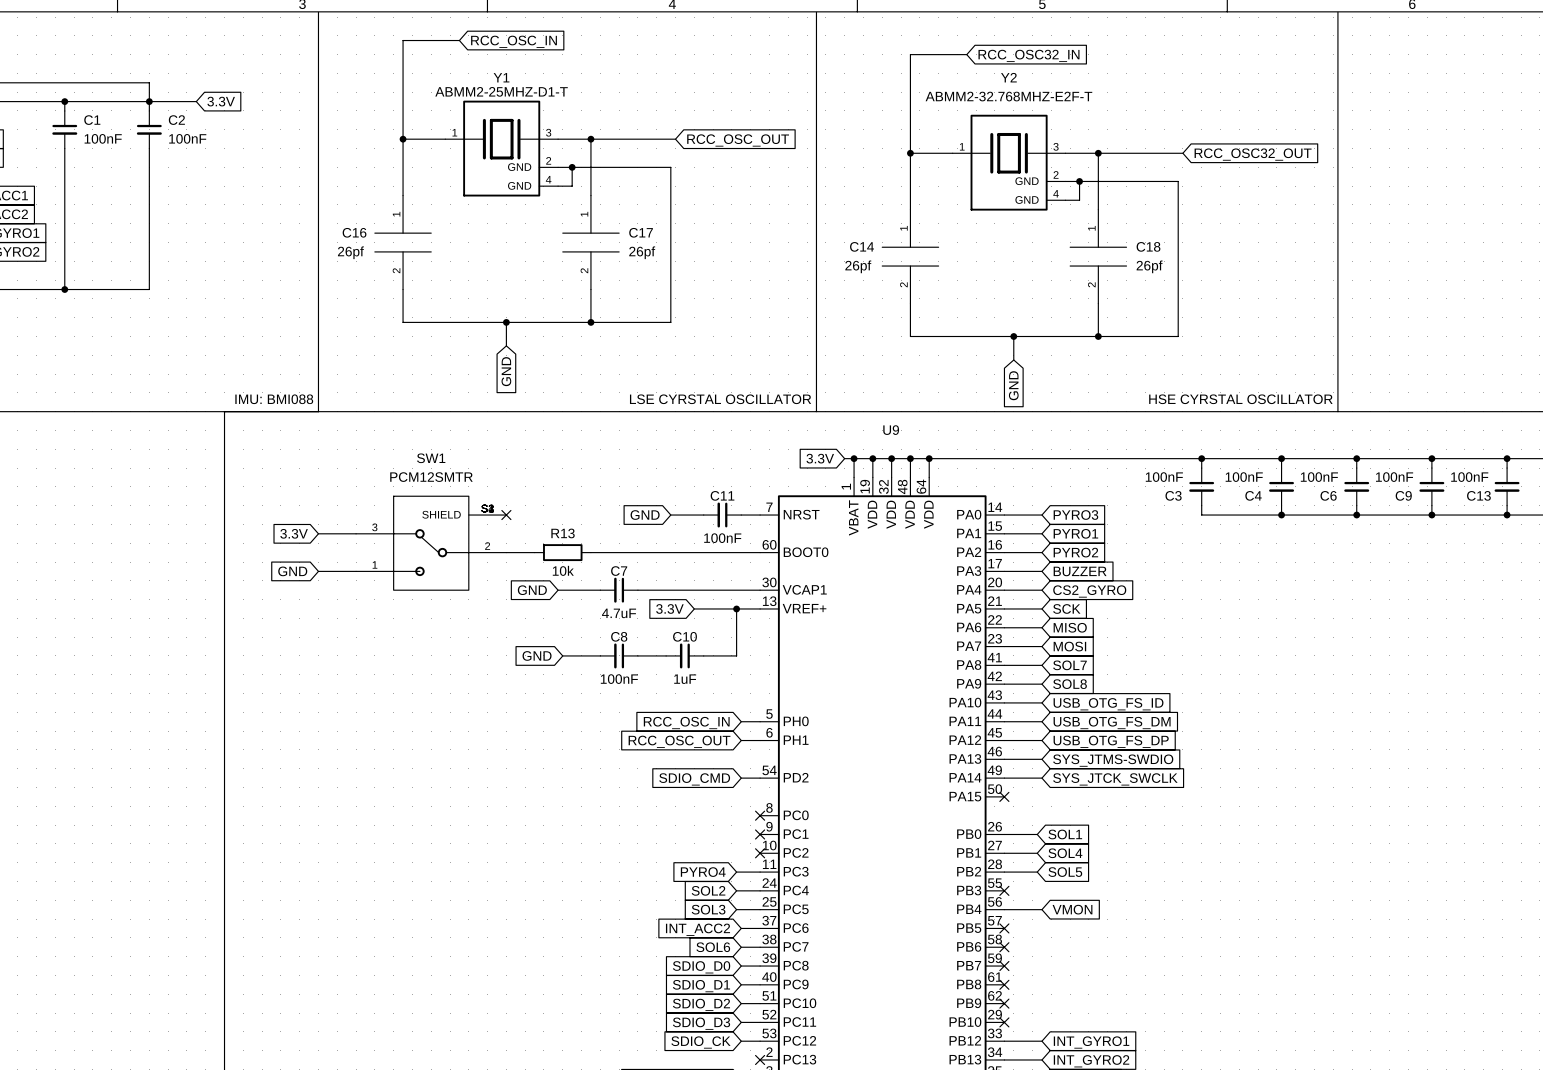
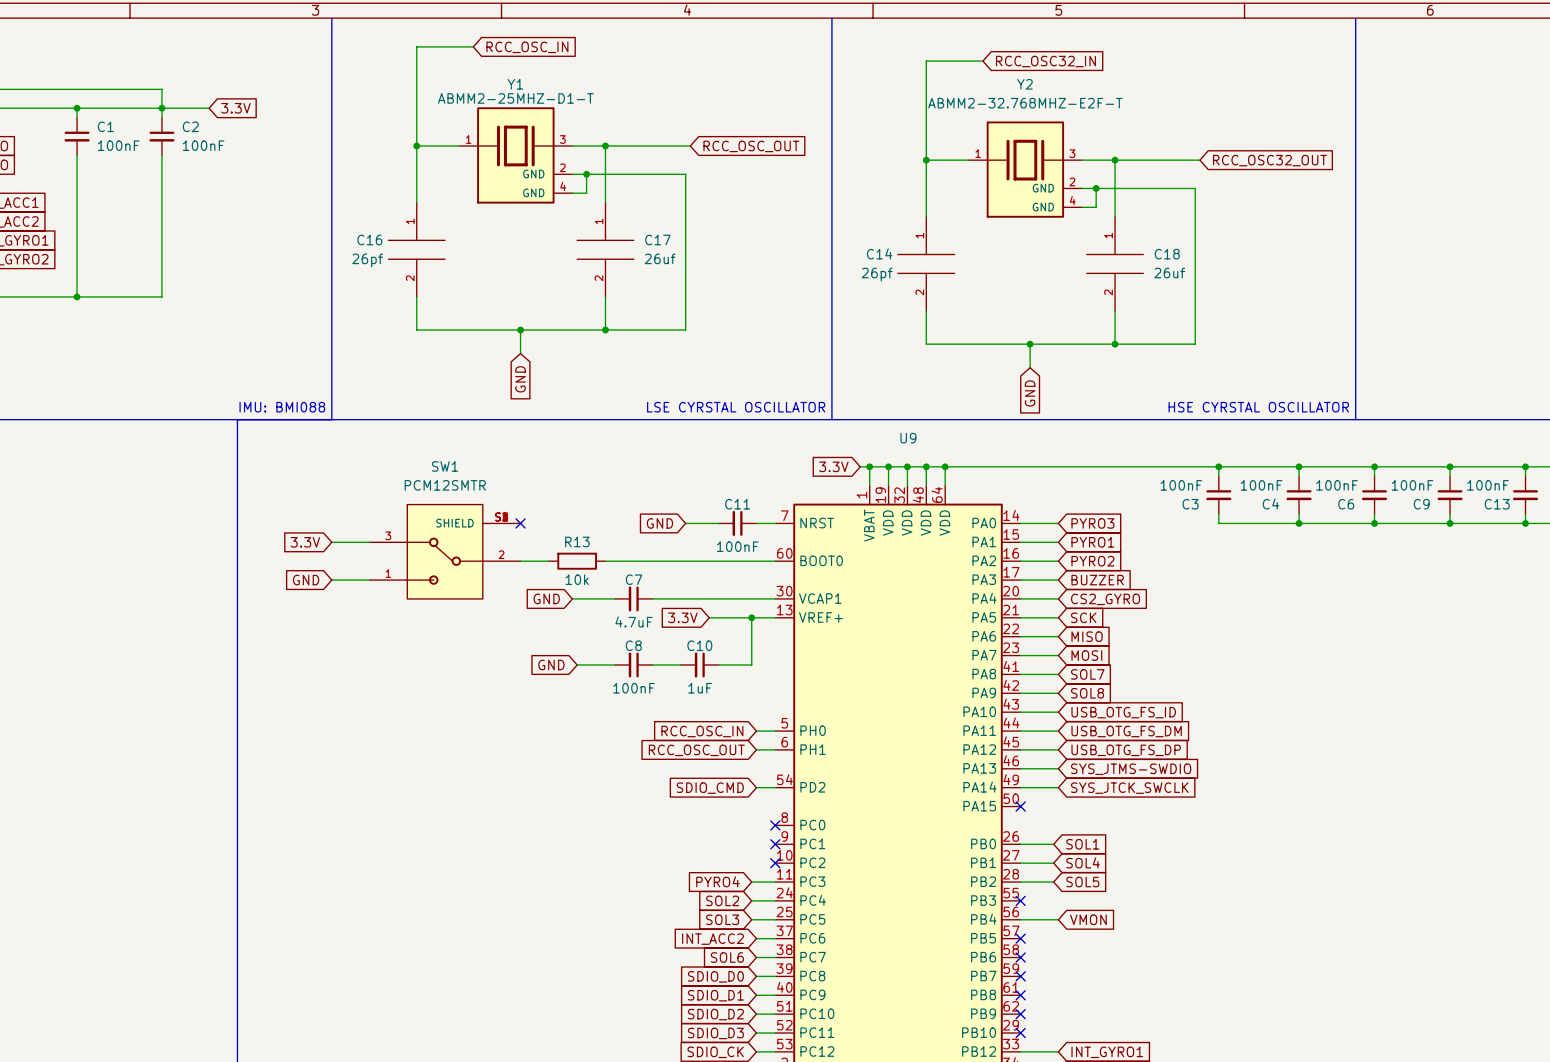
C17 value: 26pf (642, 252) -> 26uf (660, 258)
C18 value: 26pf (1149, 266) -> 26uf (1169, 273)

